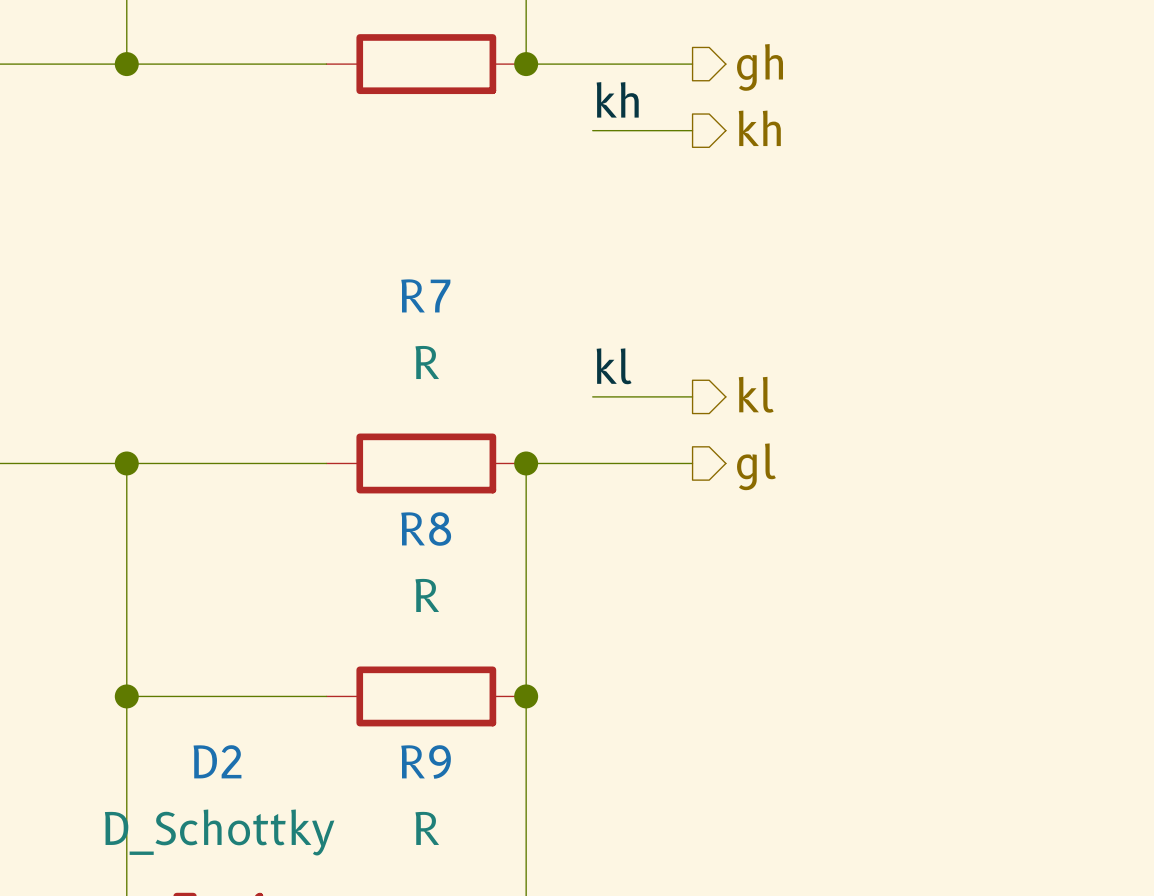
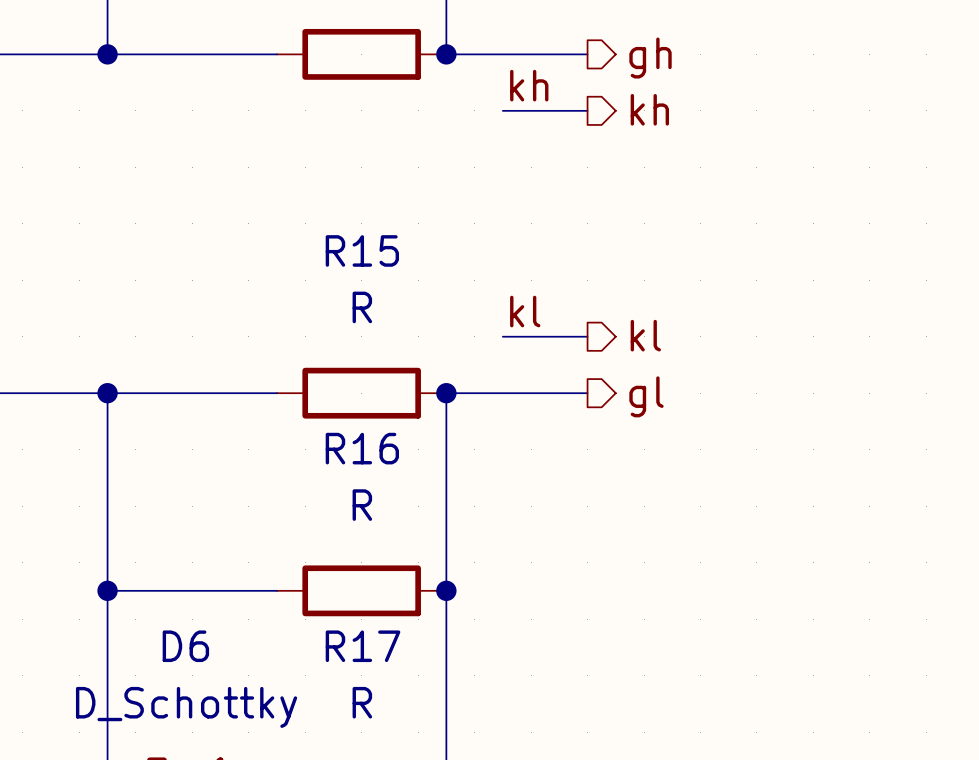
R7 name: R7 (425, 295) -> R15 (362, 250)
R8 name: R8 (426, 529) -> R16 (362, 448)
D2 name: D2 (217, 761) -> D6 (185, 646)
R9 name: R9 (426, 761) -> R17 (363, 646)

